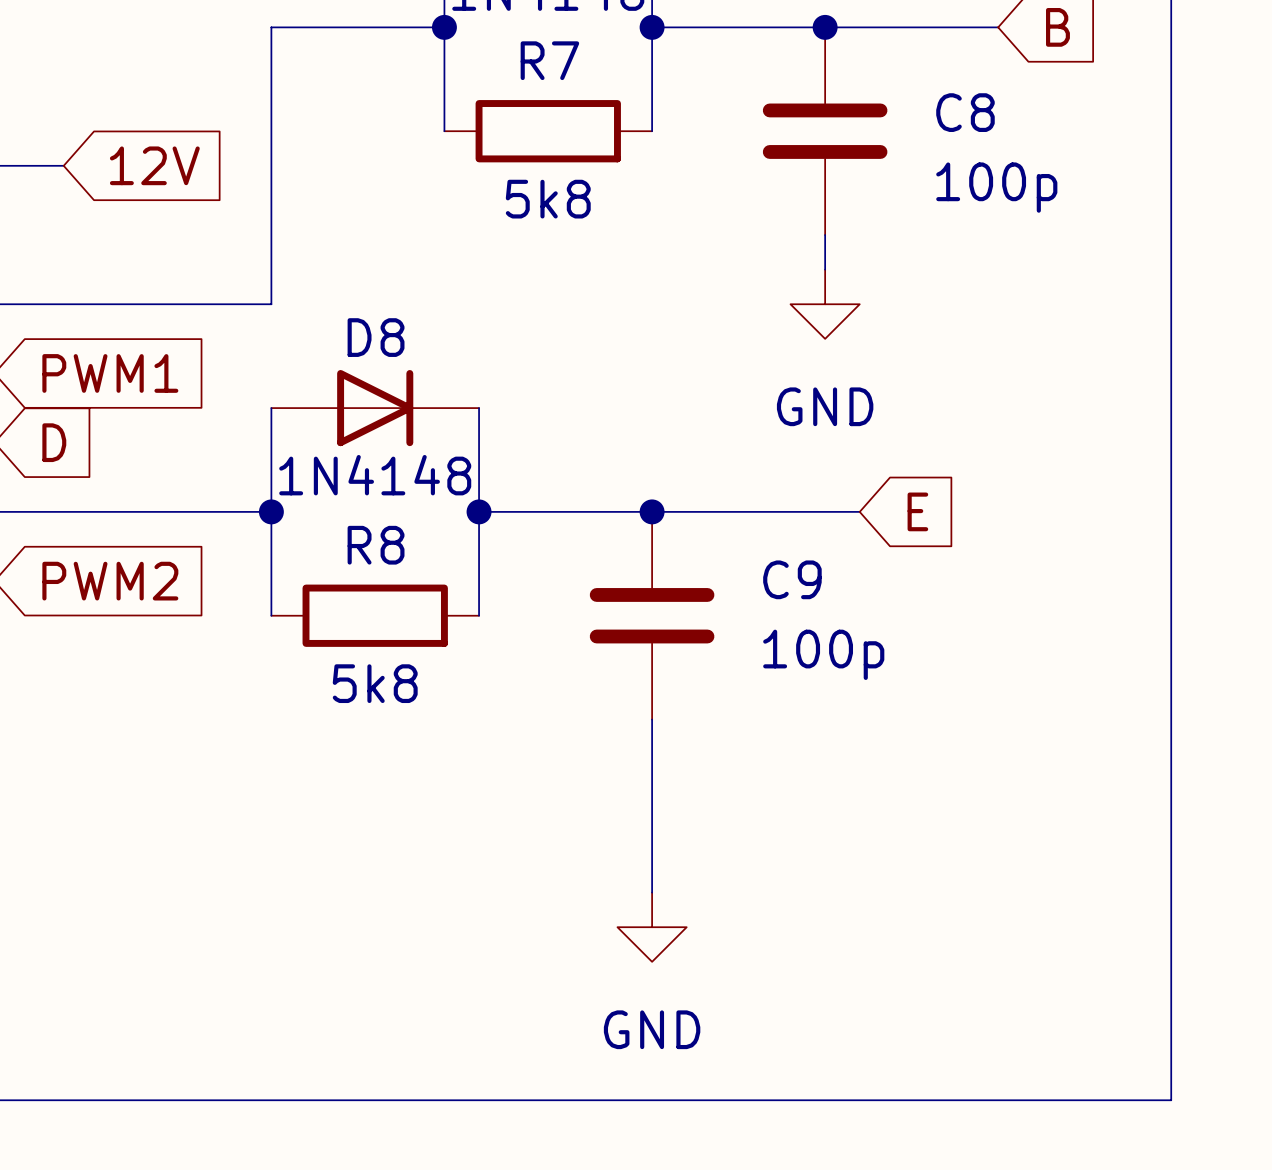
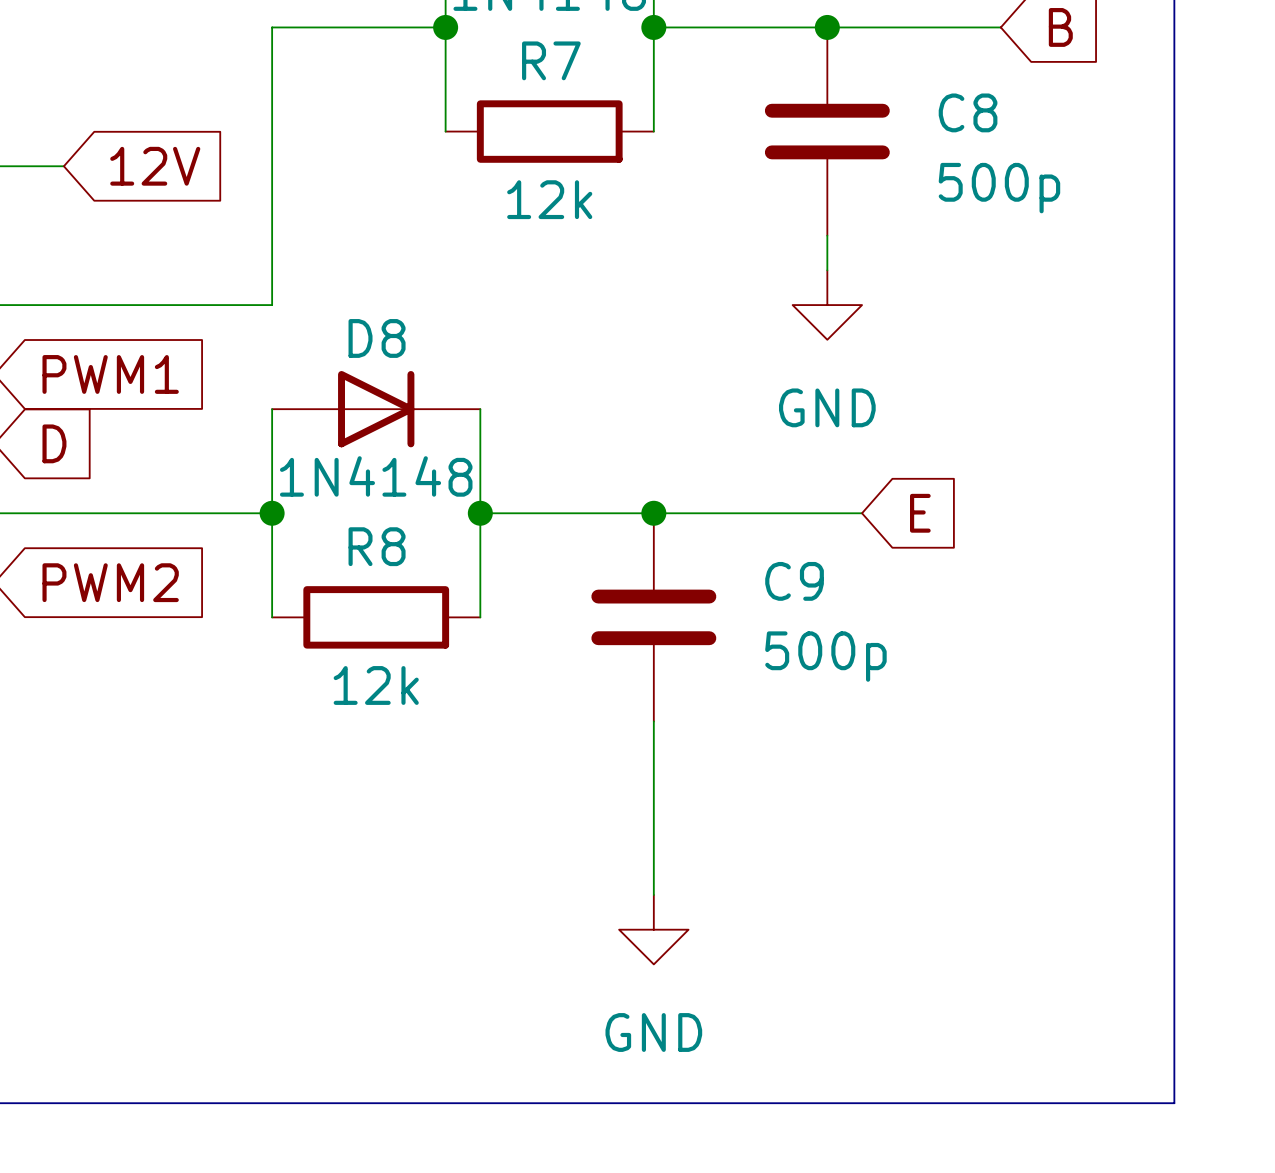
C8 value: 100p (996, 187) -> 500p (999, 188)
R7 value: 5k8 (548, 199) -> 12k (549, 199)
C9 value: 100p (823, 654) -> 500p (825, 656)
R8 value: 5k8 (375, 683) -> 12k (376, 685)

